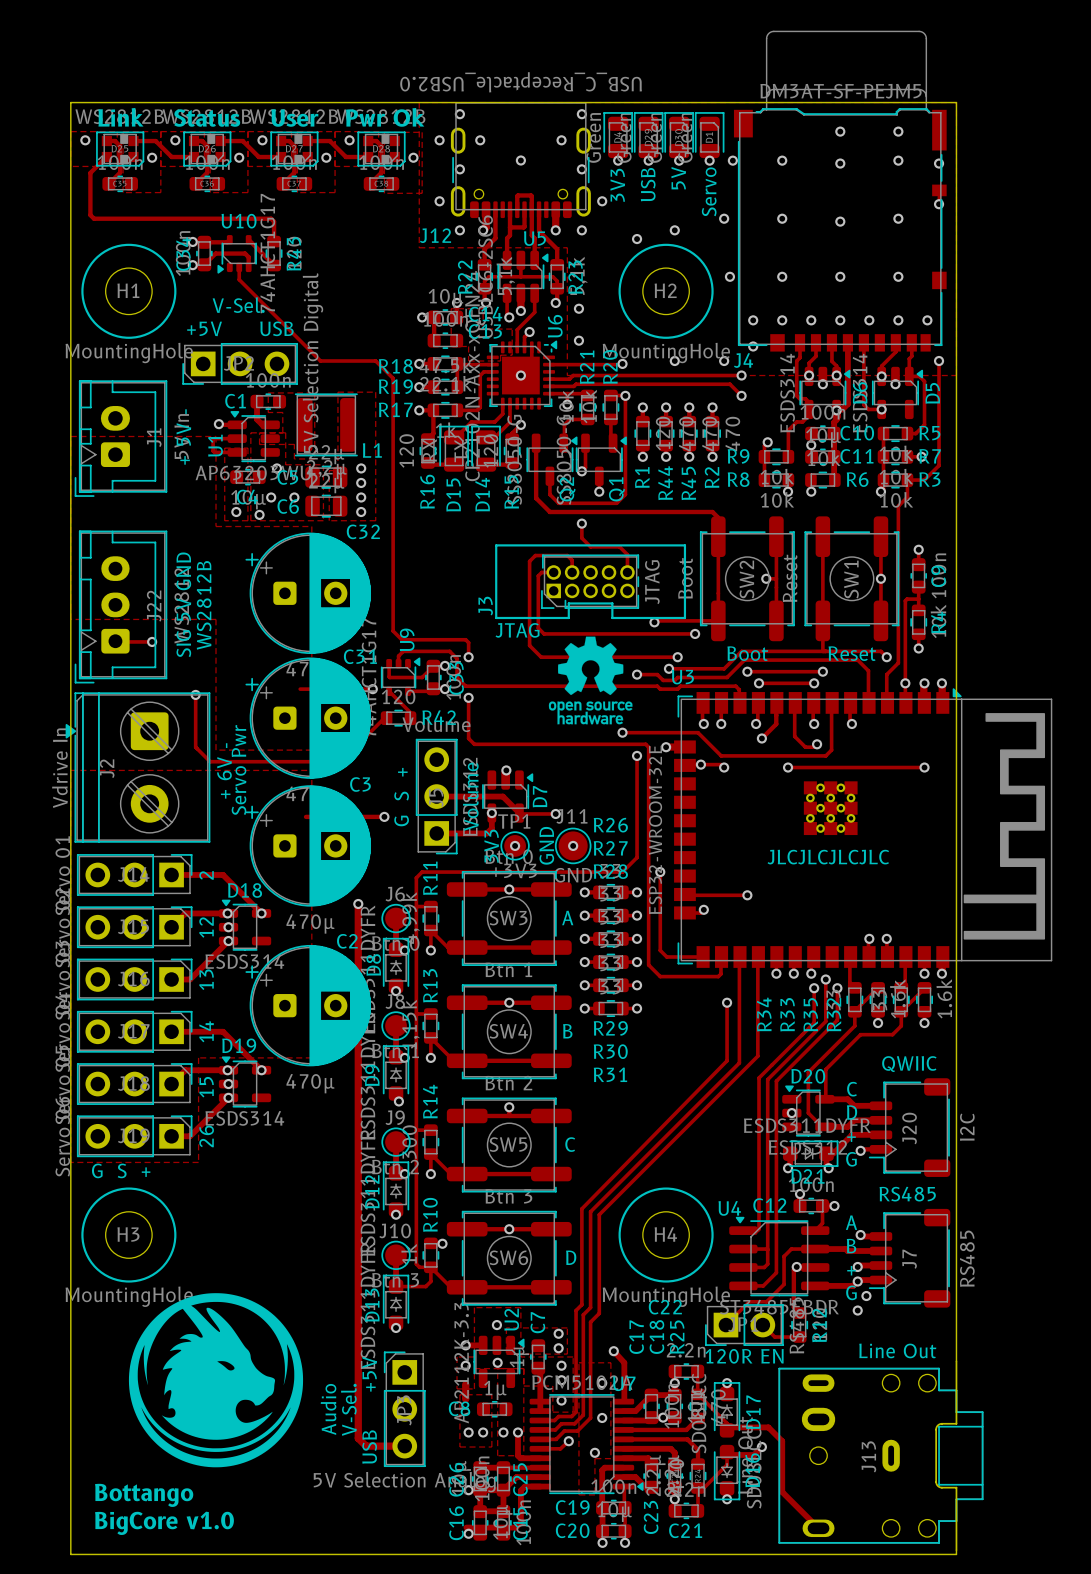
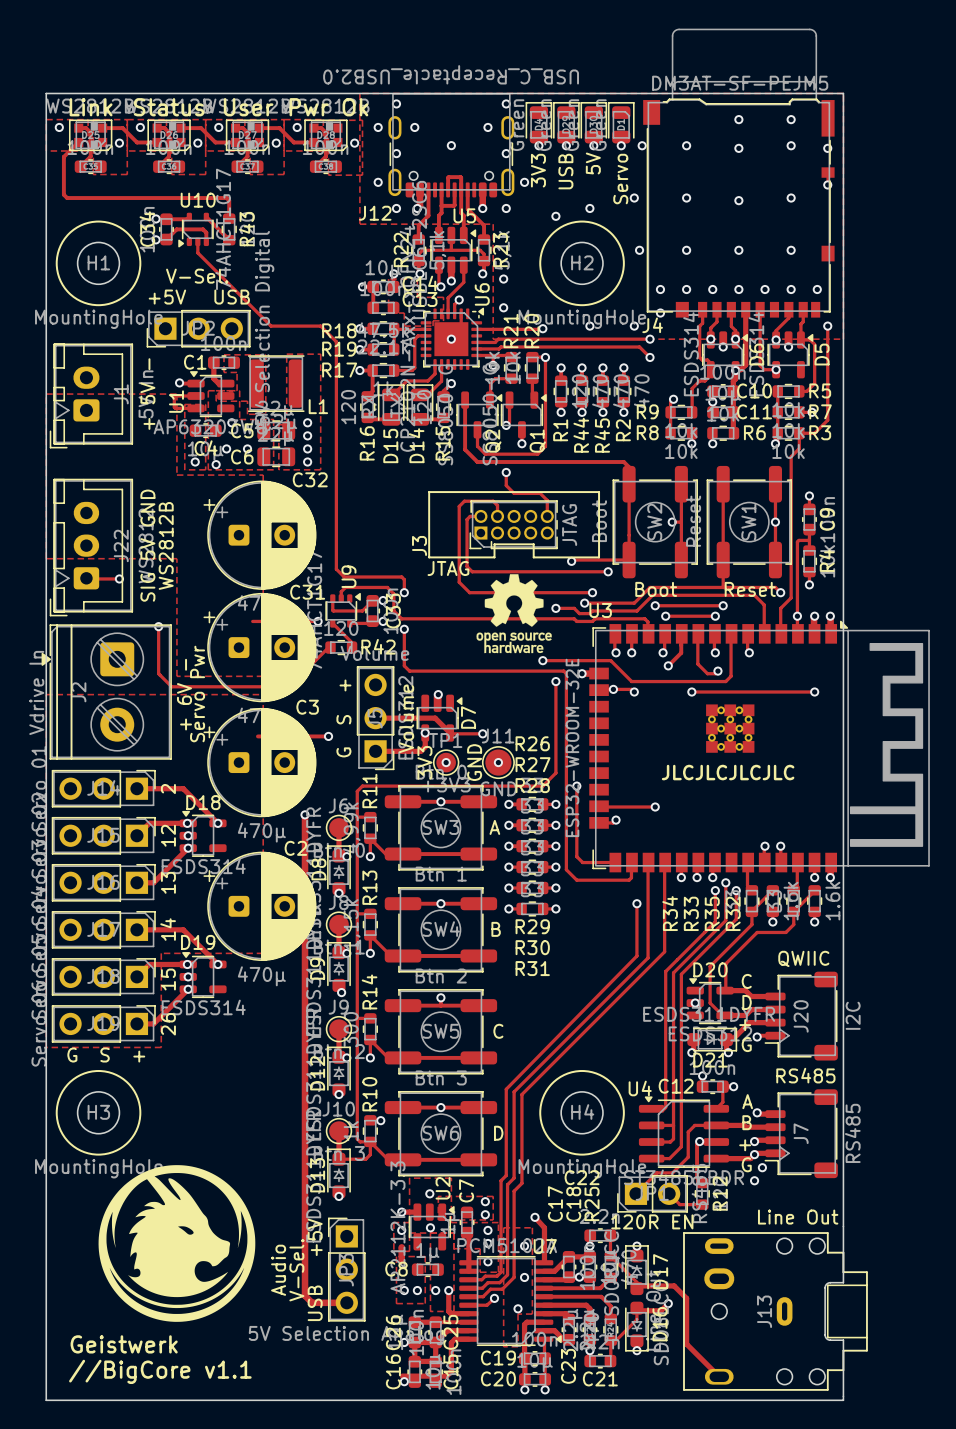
text: Bottango (144, 1495) -> Geistwerk (124, 1344)
text: BigCore v1.0 (164, 1523) -> //BigCore v1.1 (160, 1371)

